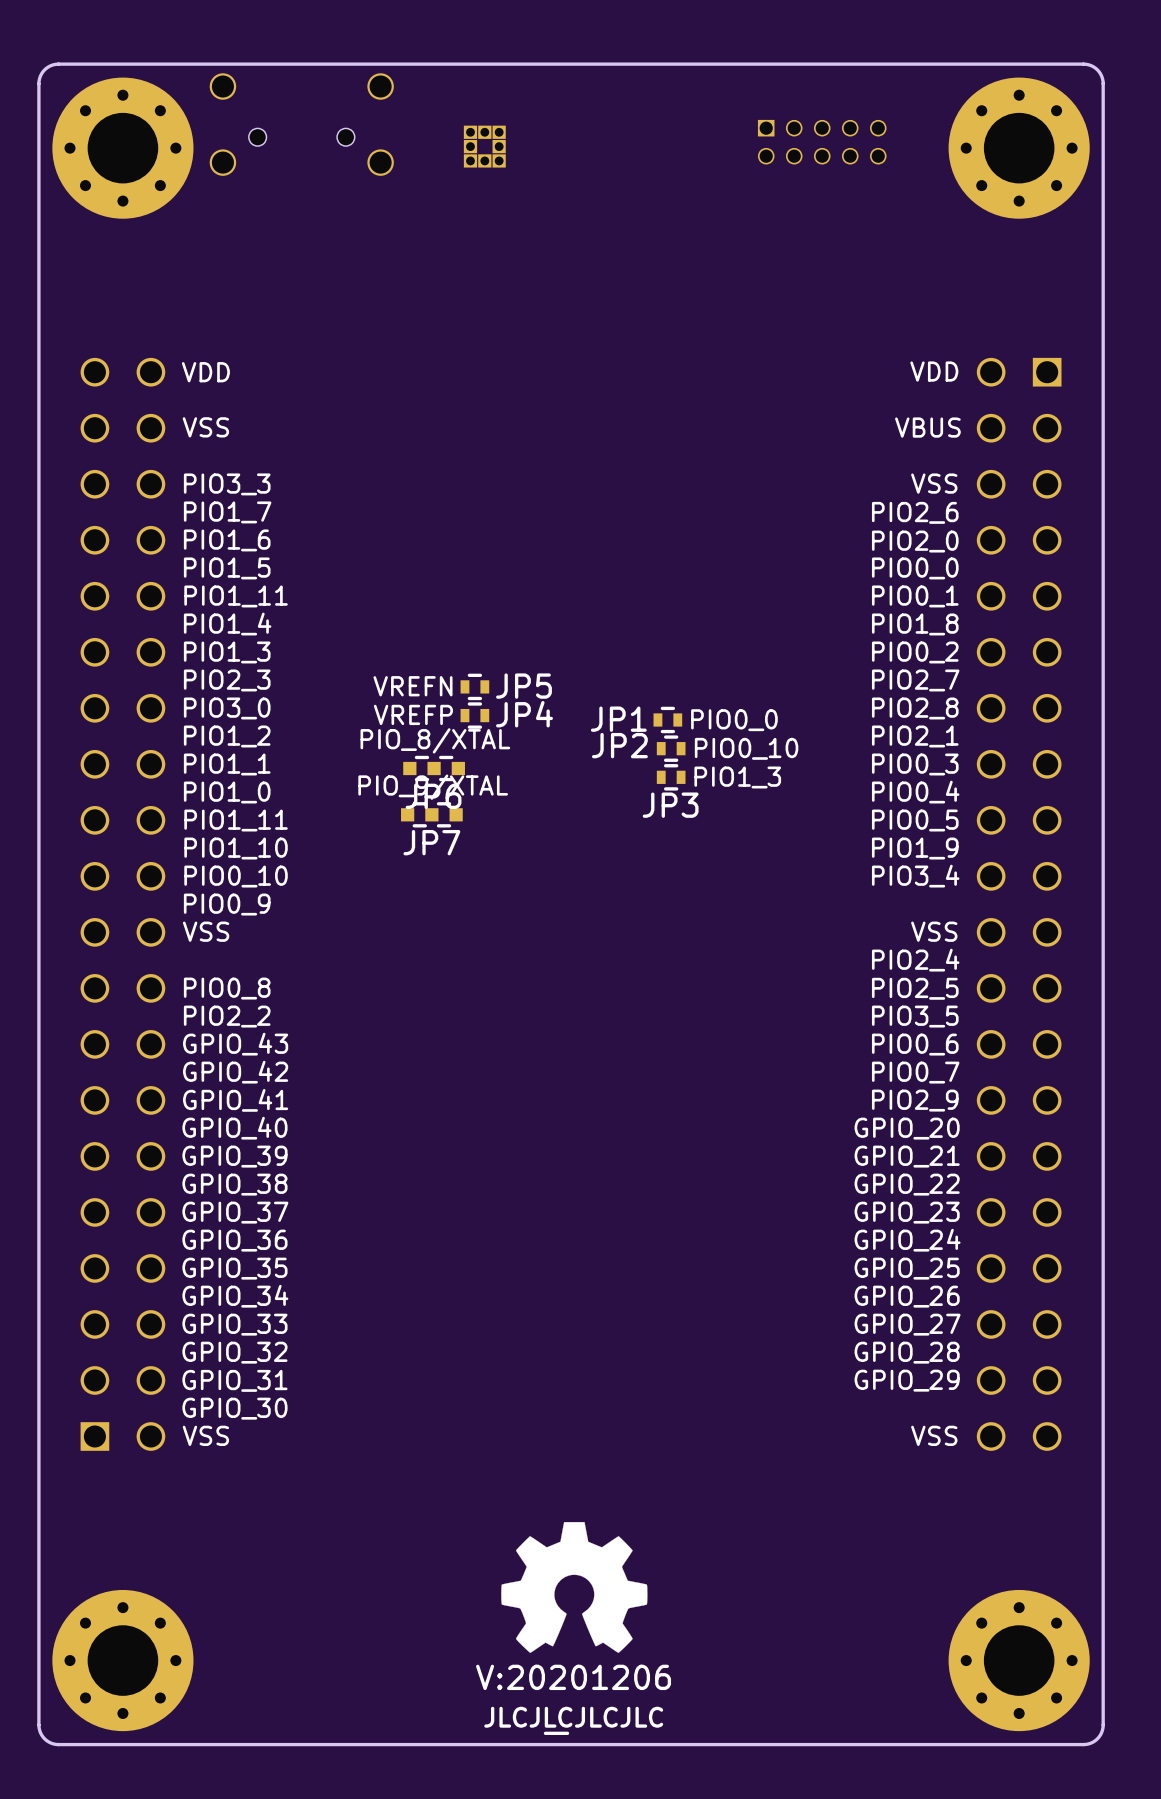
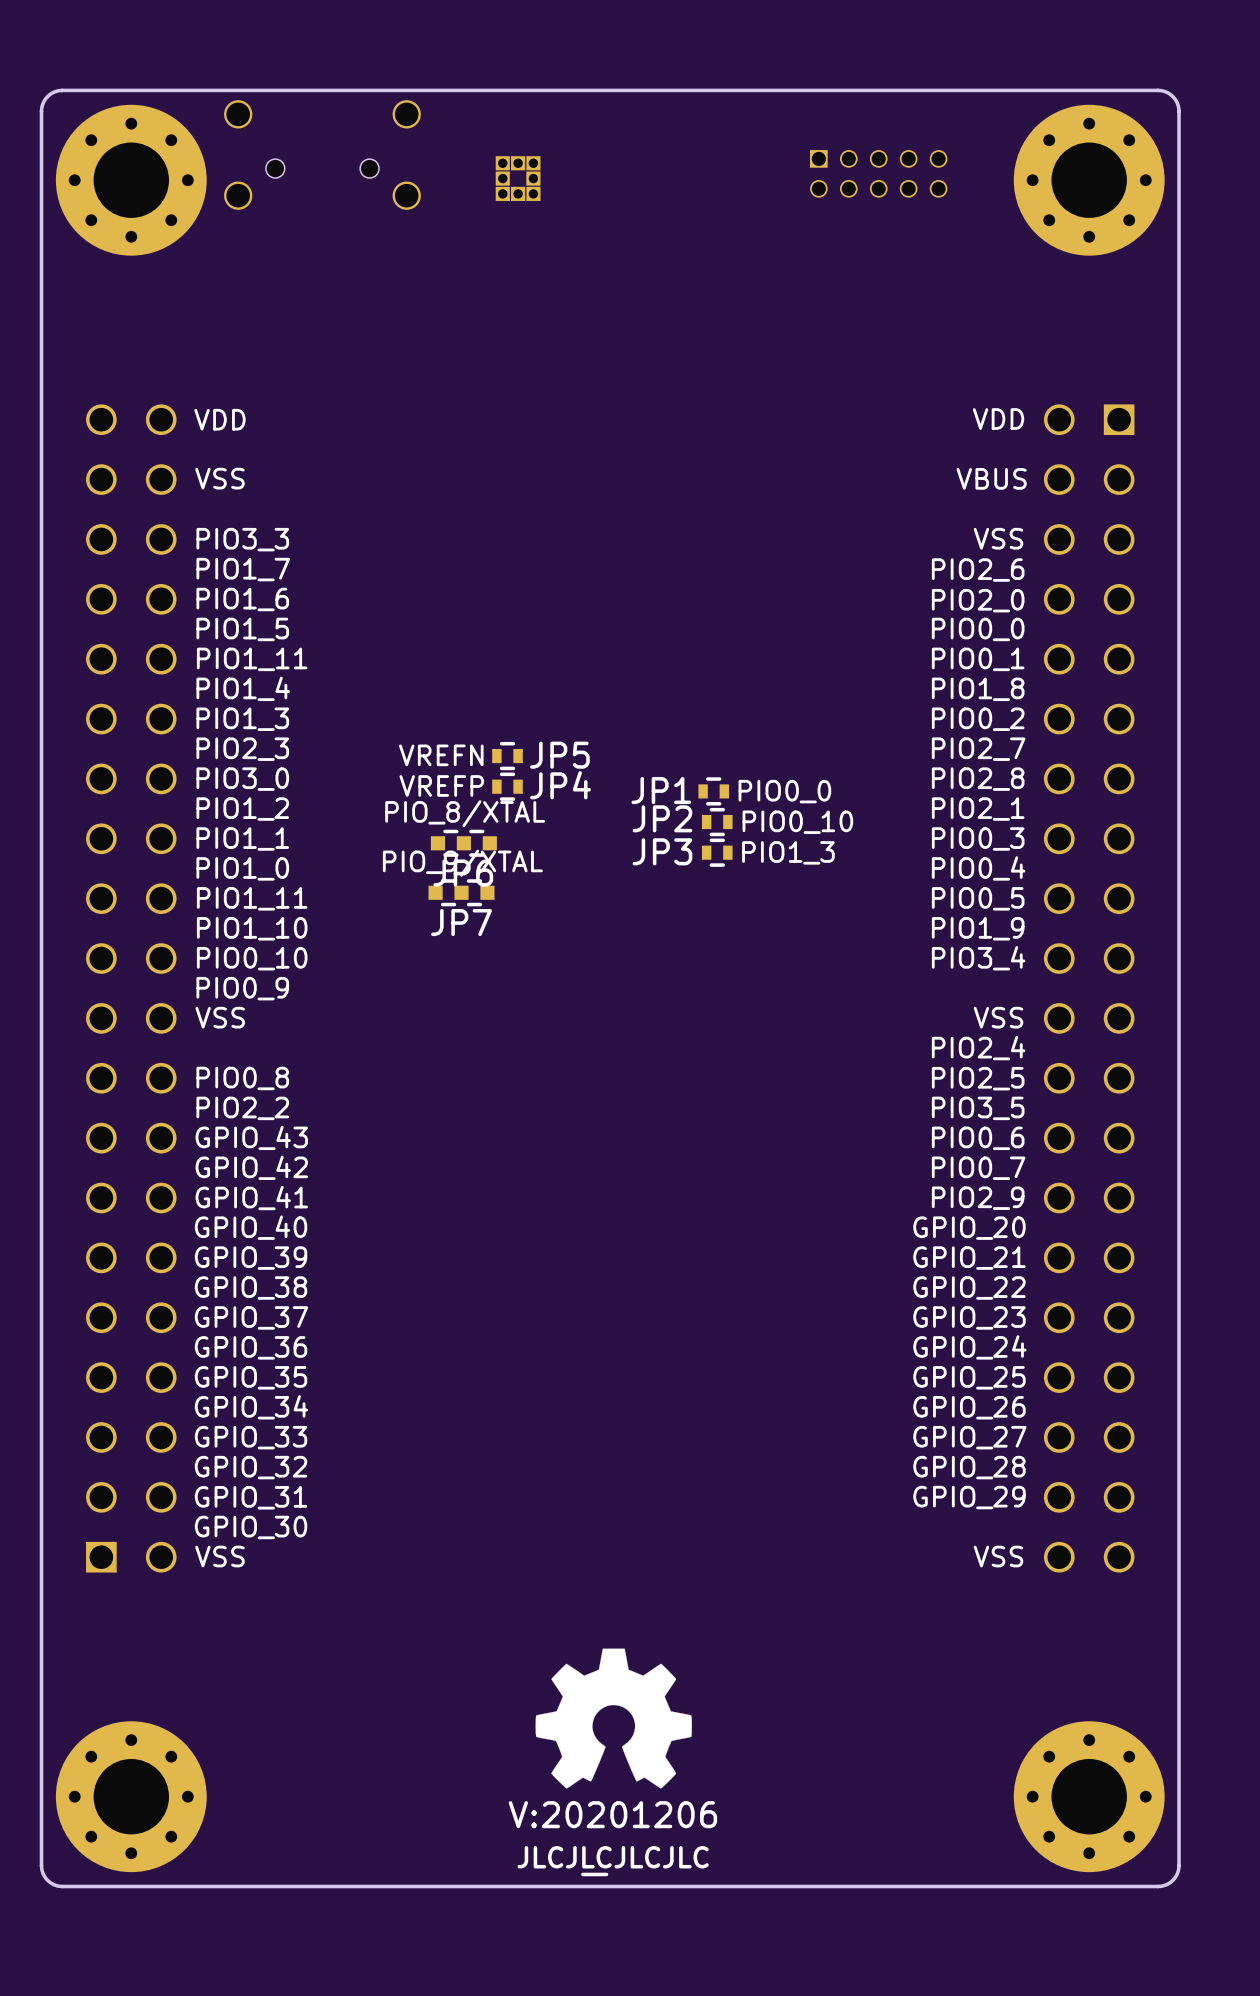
JP3 name position: JP3 (670, 805) -> JP3 (662, 851)

